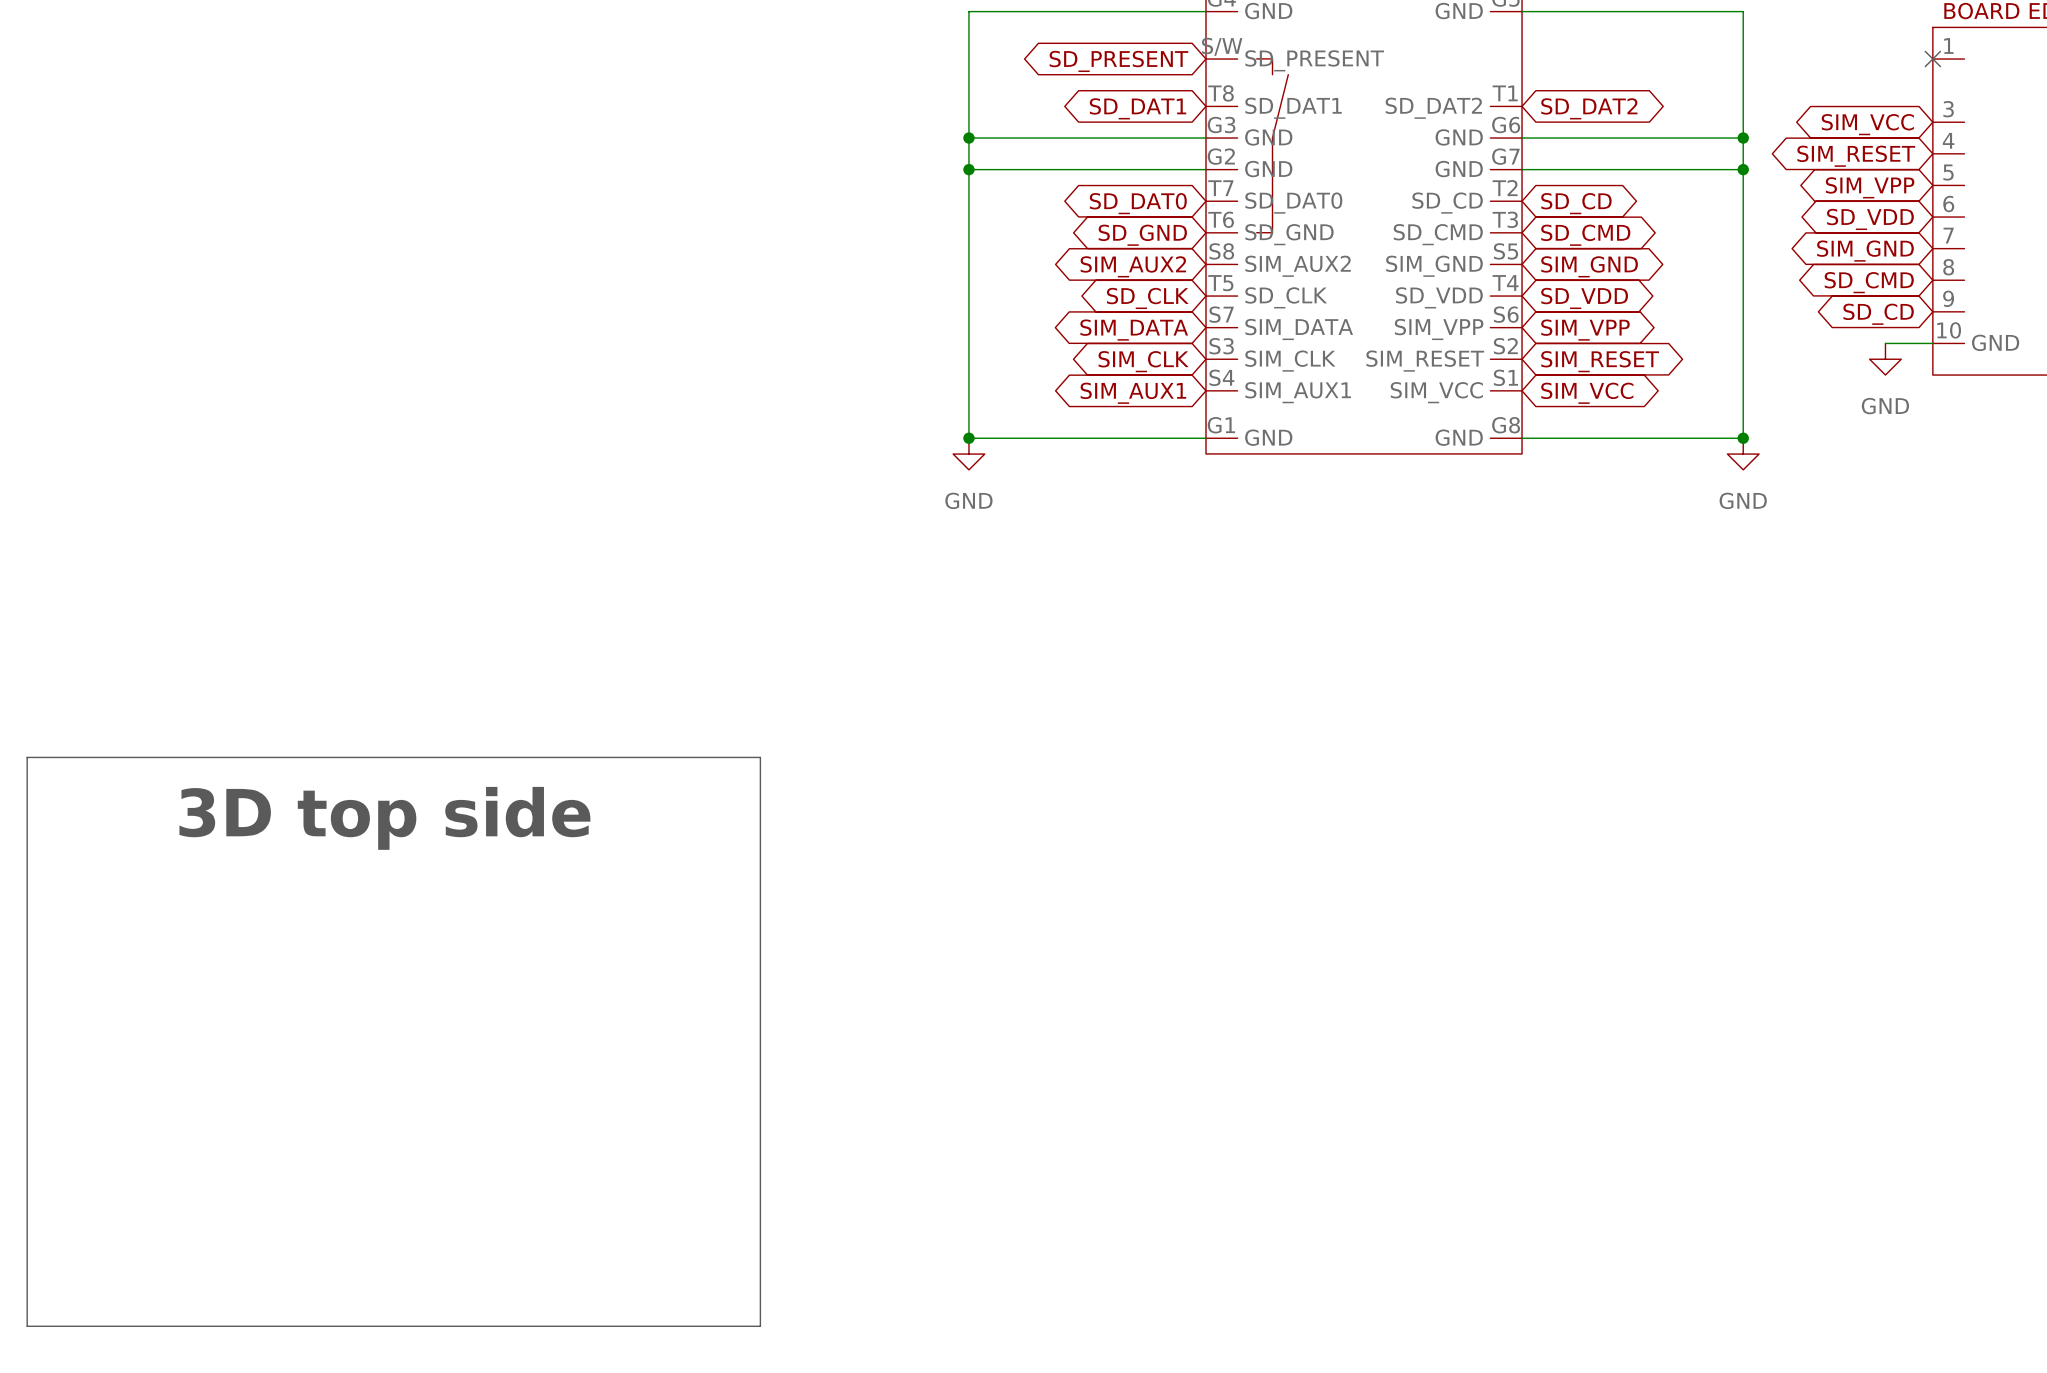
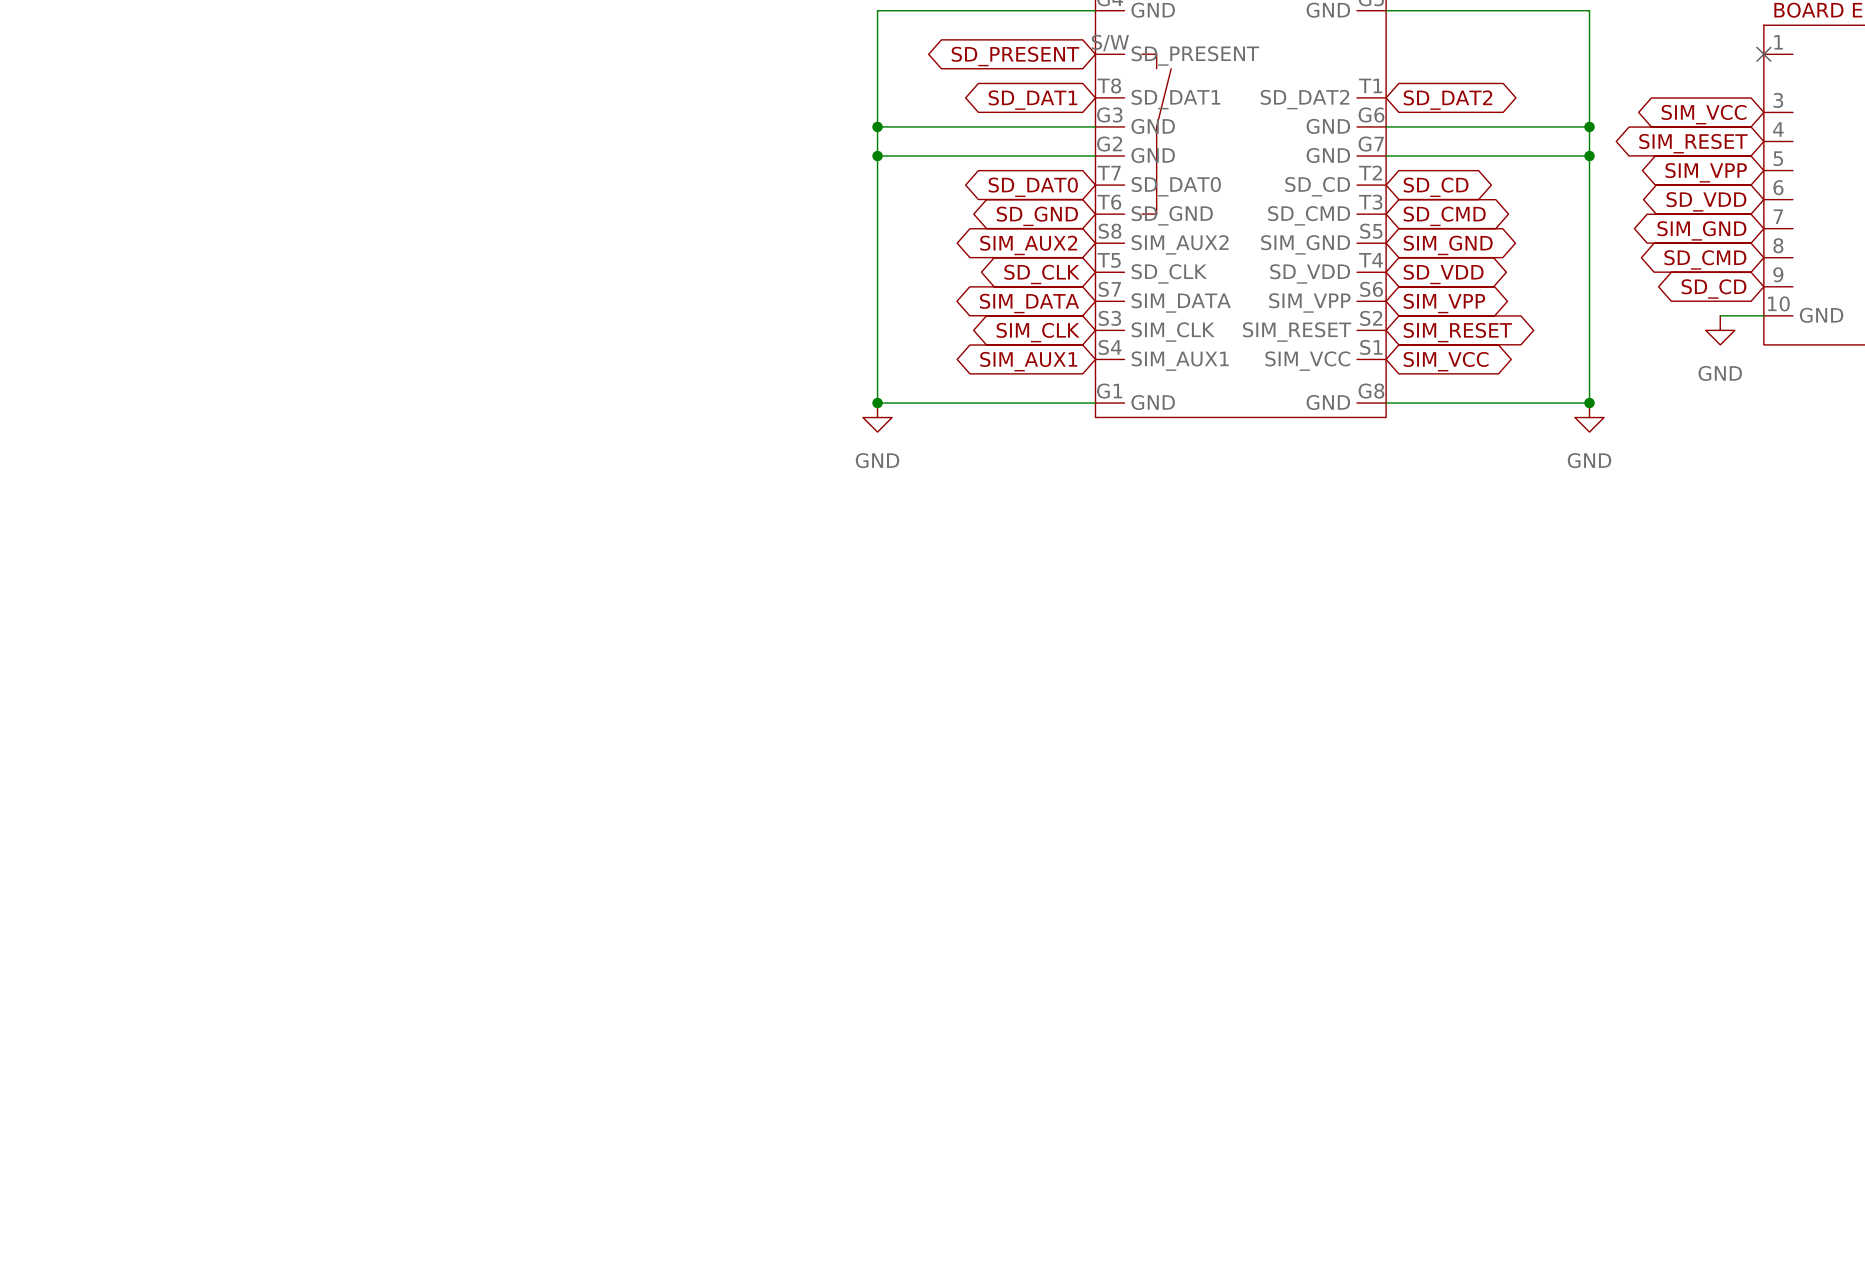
line: (27, 757) (760, 757) (760, 1326) (27, 1326) (27, 757) -> none
text: 3D top side (384, 818) -> none

